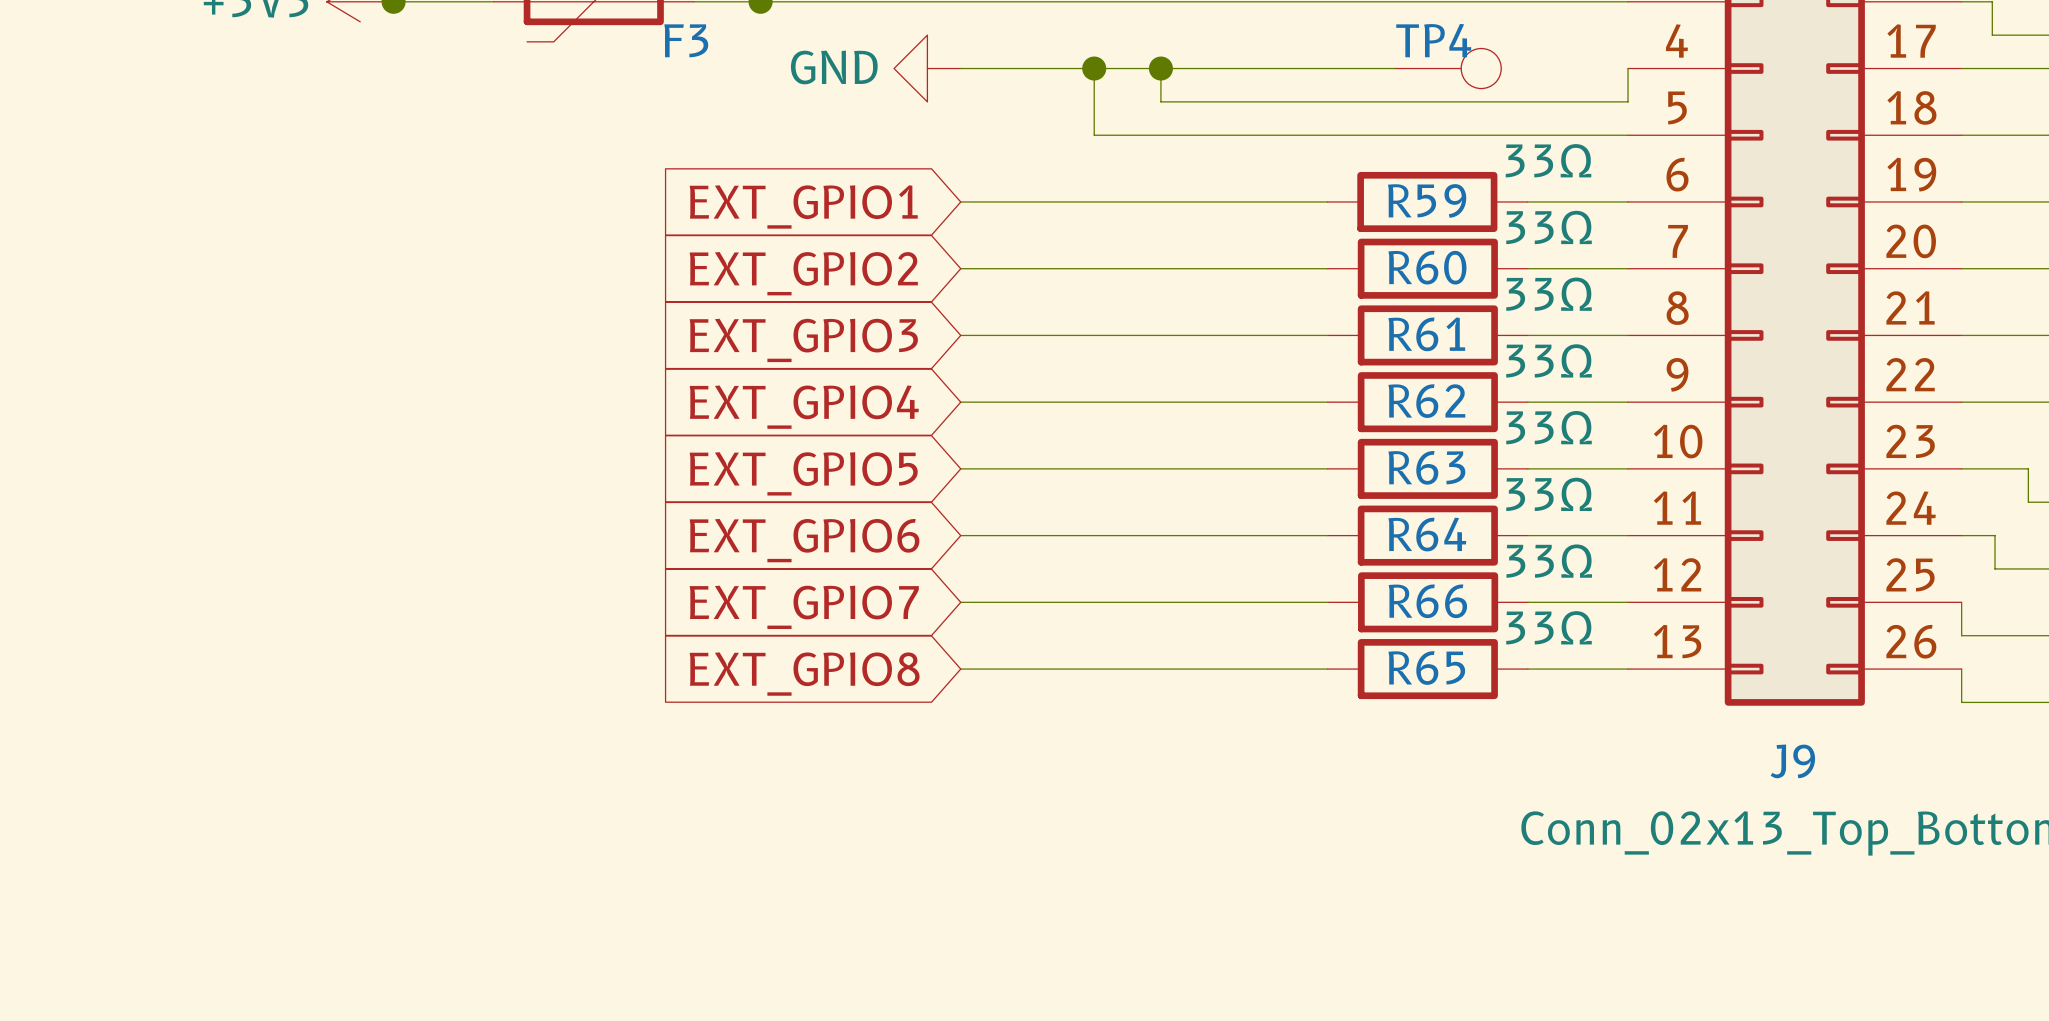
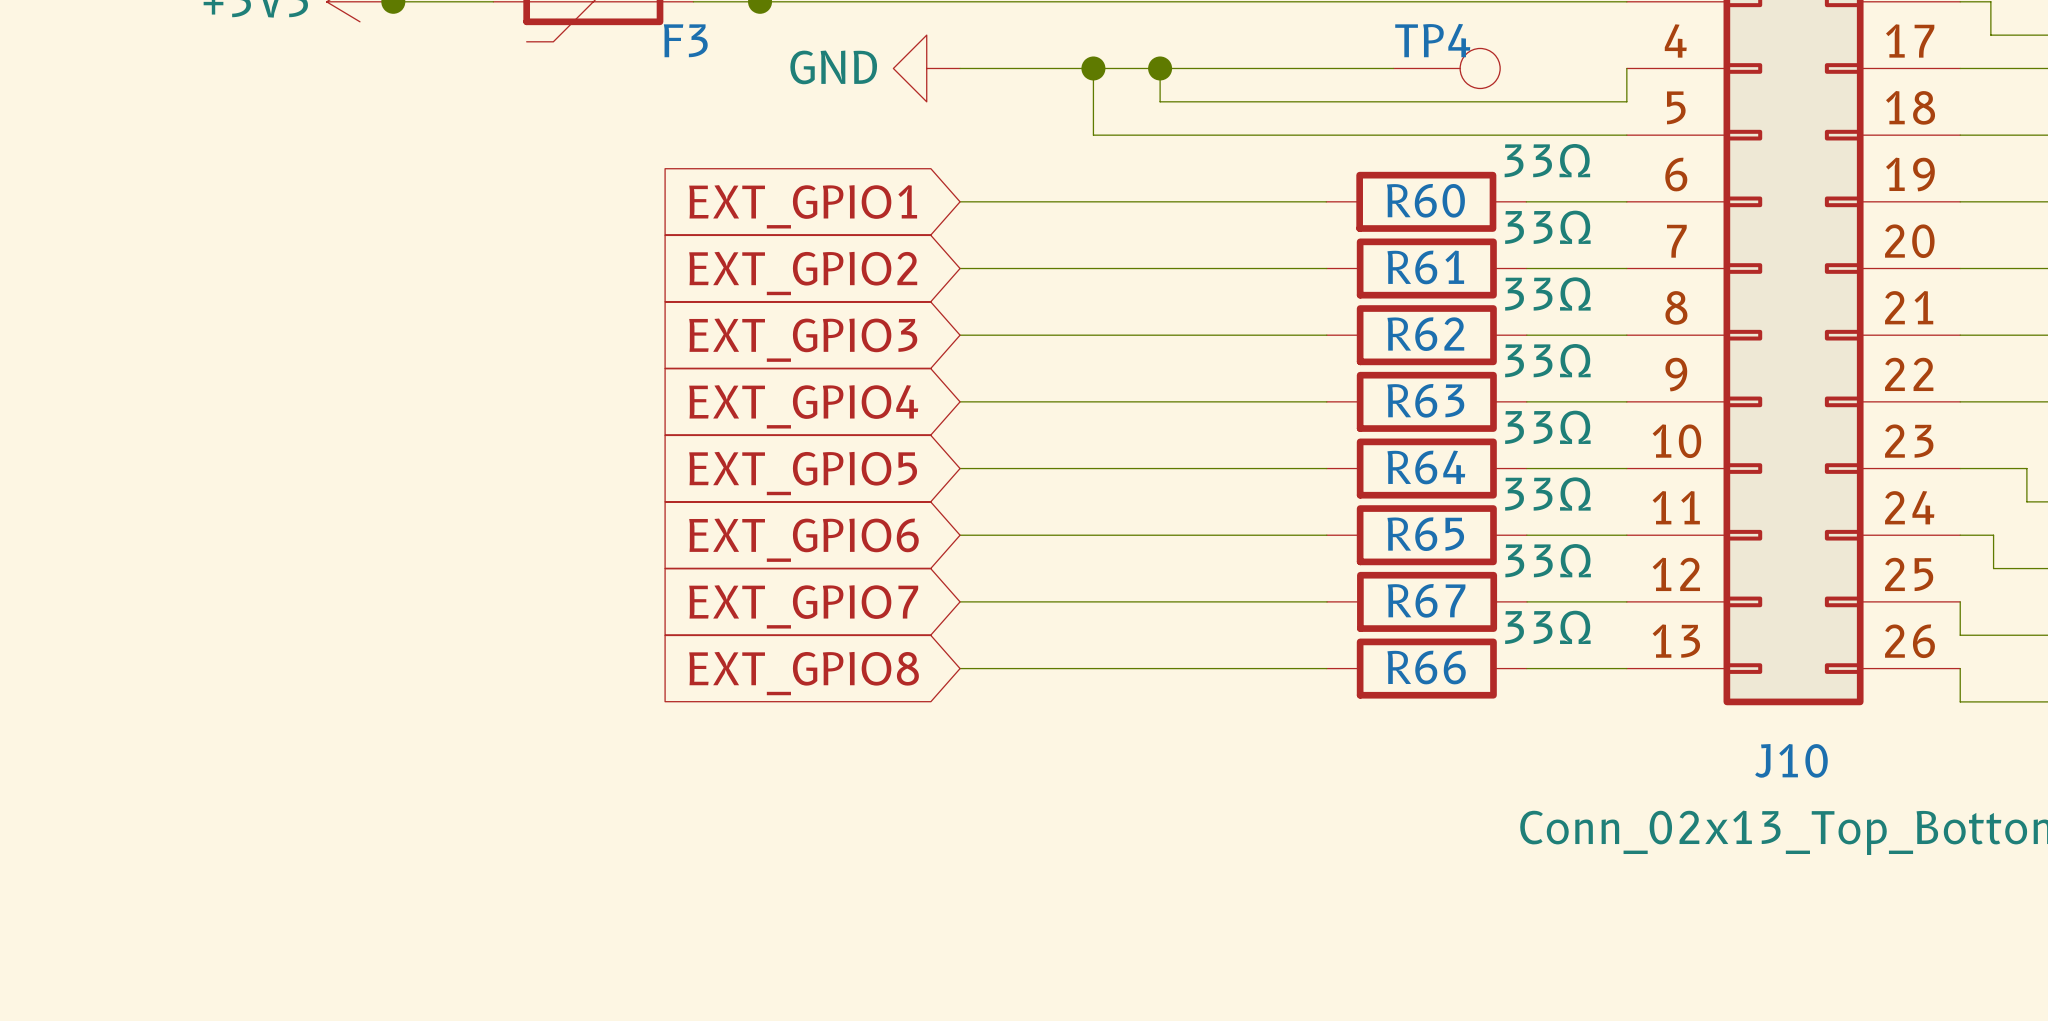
R59 name: R59 (1427, 200) -> R60 (1425, 200)
R60 name: R60 (1427, 267) -> R61 (1425, 267)
R61 name: R61 (1426, 334) -> R62 (1425, 334)
R62 name: R62 (1426, 401) -> R63 (1425, 400)
R63 name: R63 (1426, 467) -> R64 (1426, 467)
R64 name: R64 (1427, 534) -> R65 (1425, 534)
R66 name: R66 (1427, 601) -> R67 (1426, 600)
R65 name: R65 (1426, 668) -> R66 (1426, 667)
J9 name: J9 (1792, 761) -> J10 (1791, 760)

